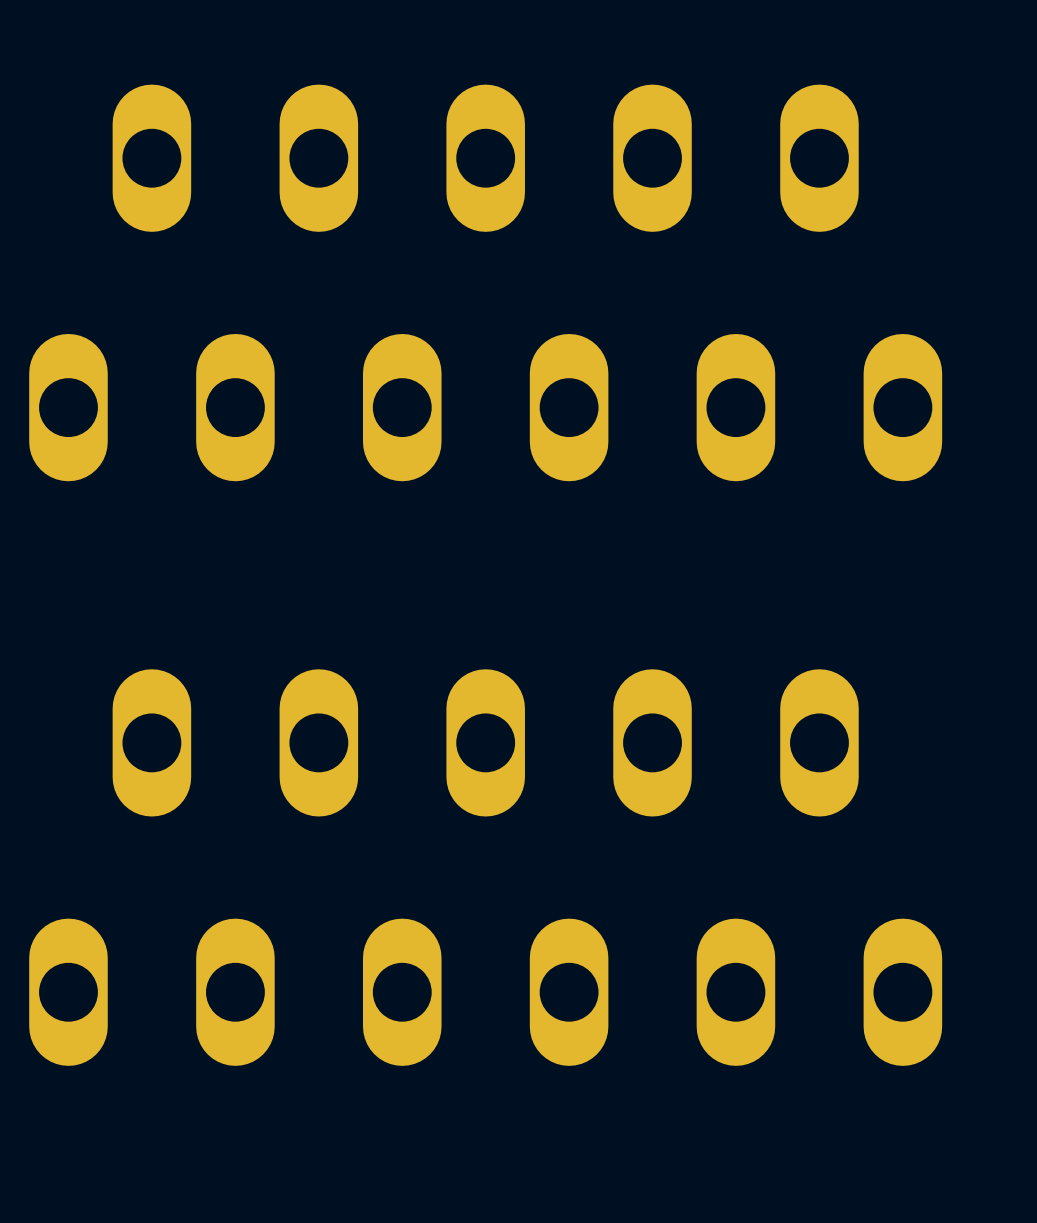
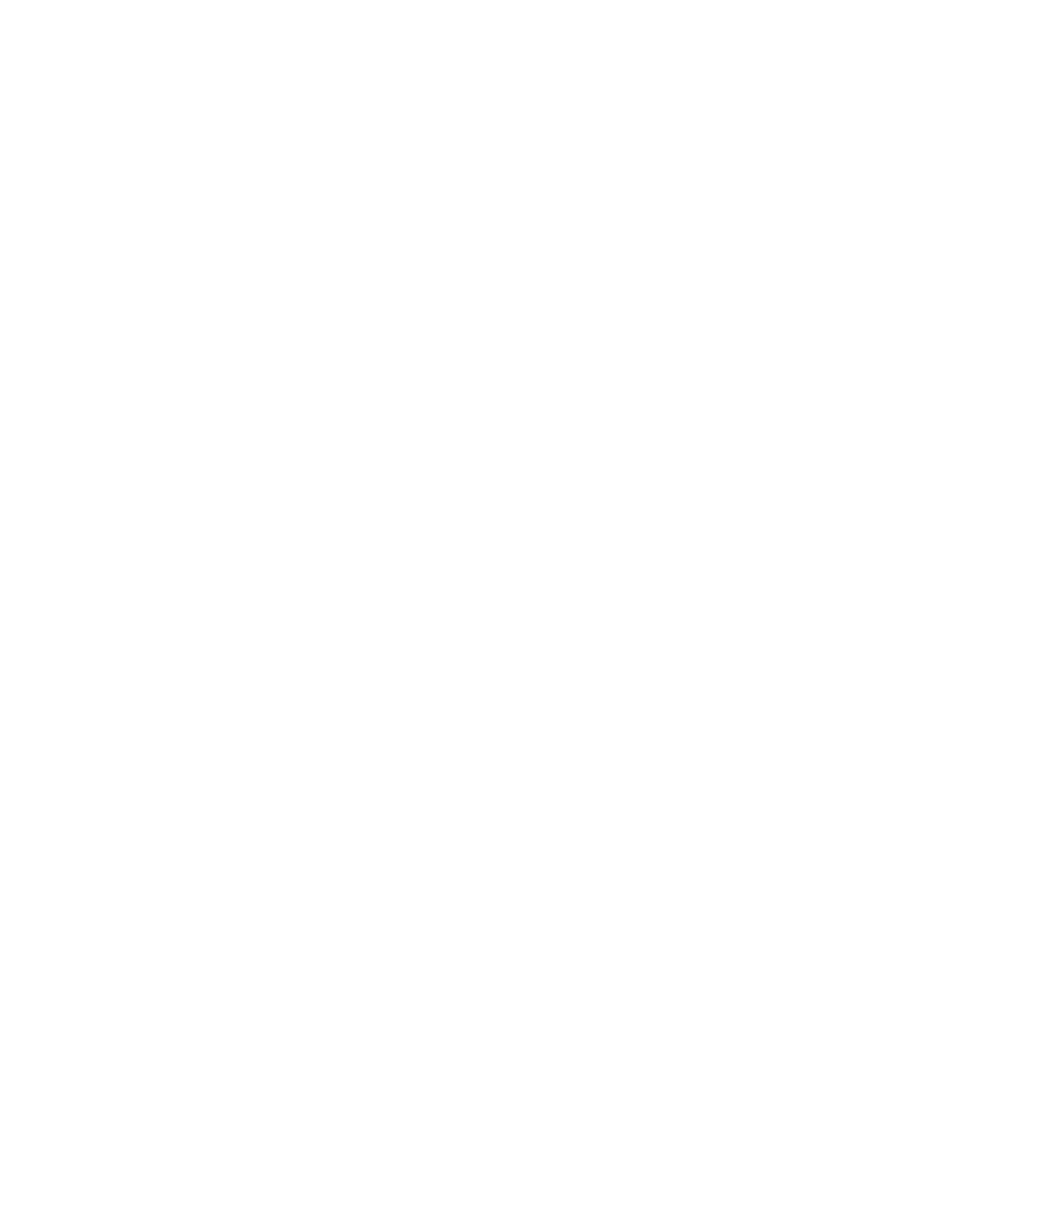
part: (485, 282) -> none
part: (485, 867) -> none

